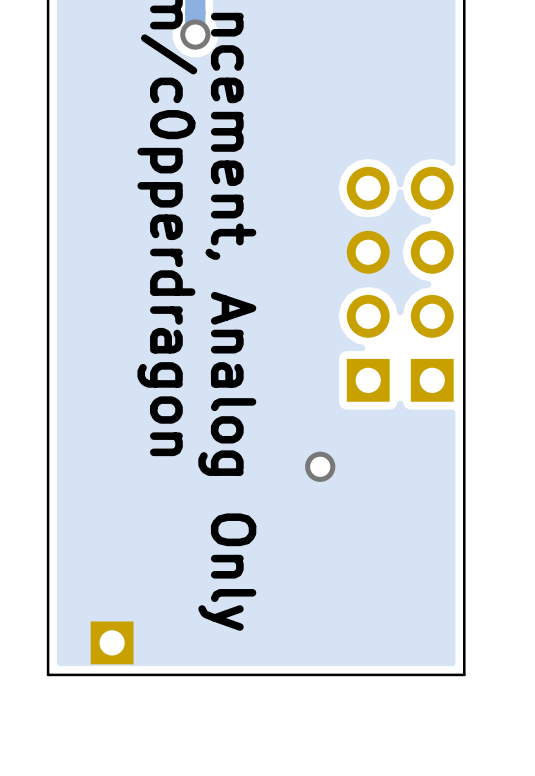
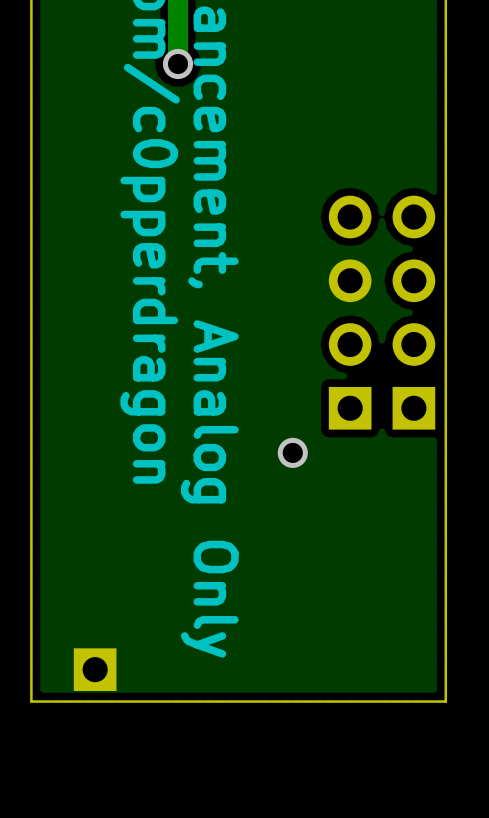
via position: (320, 466) -> (292, 452)

